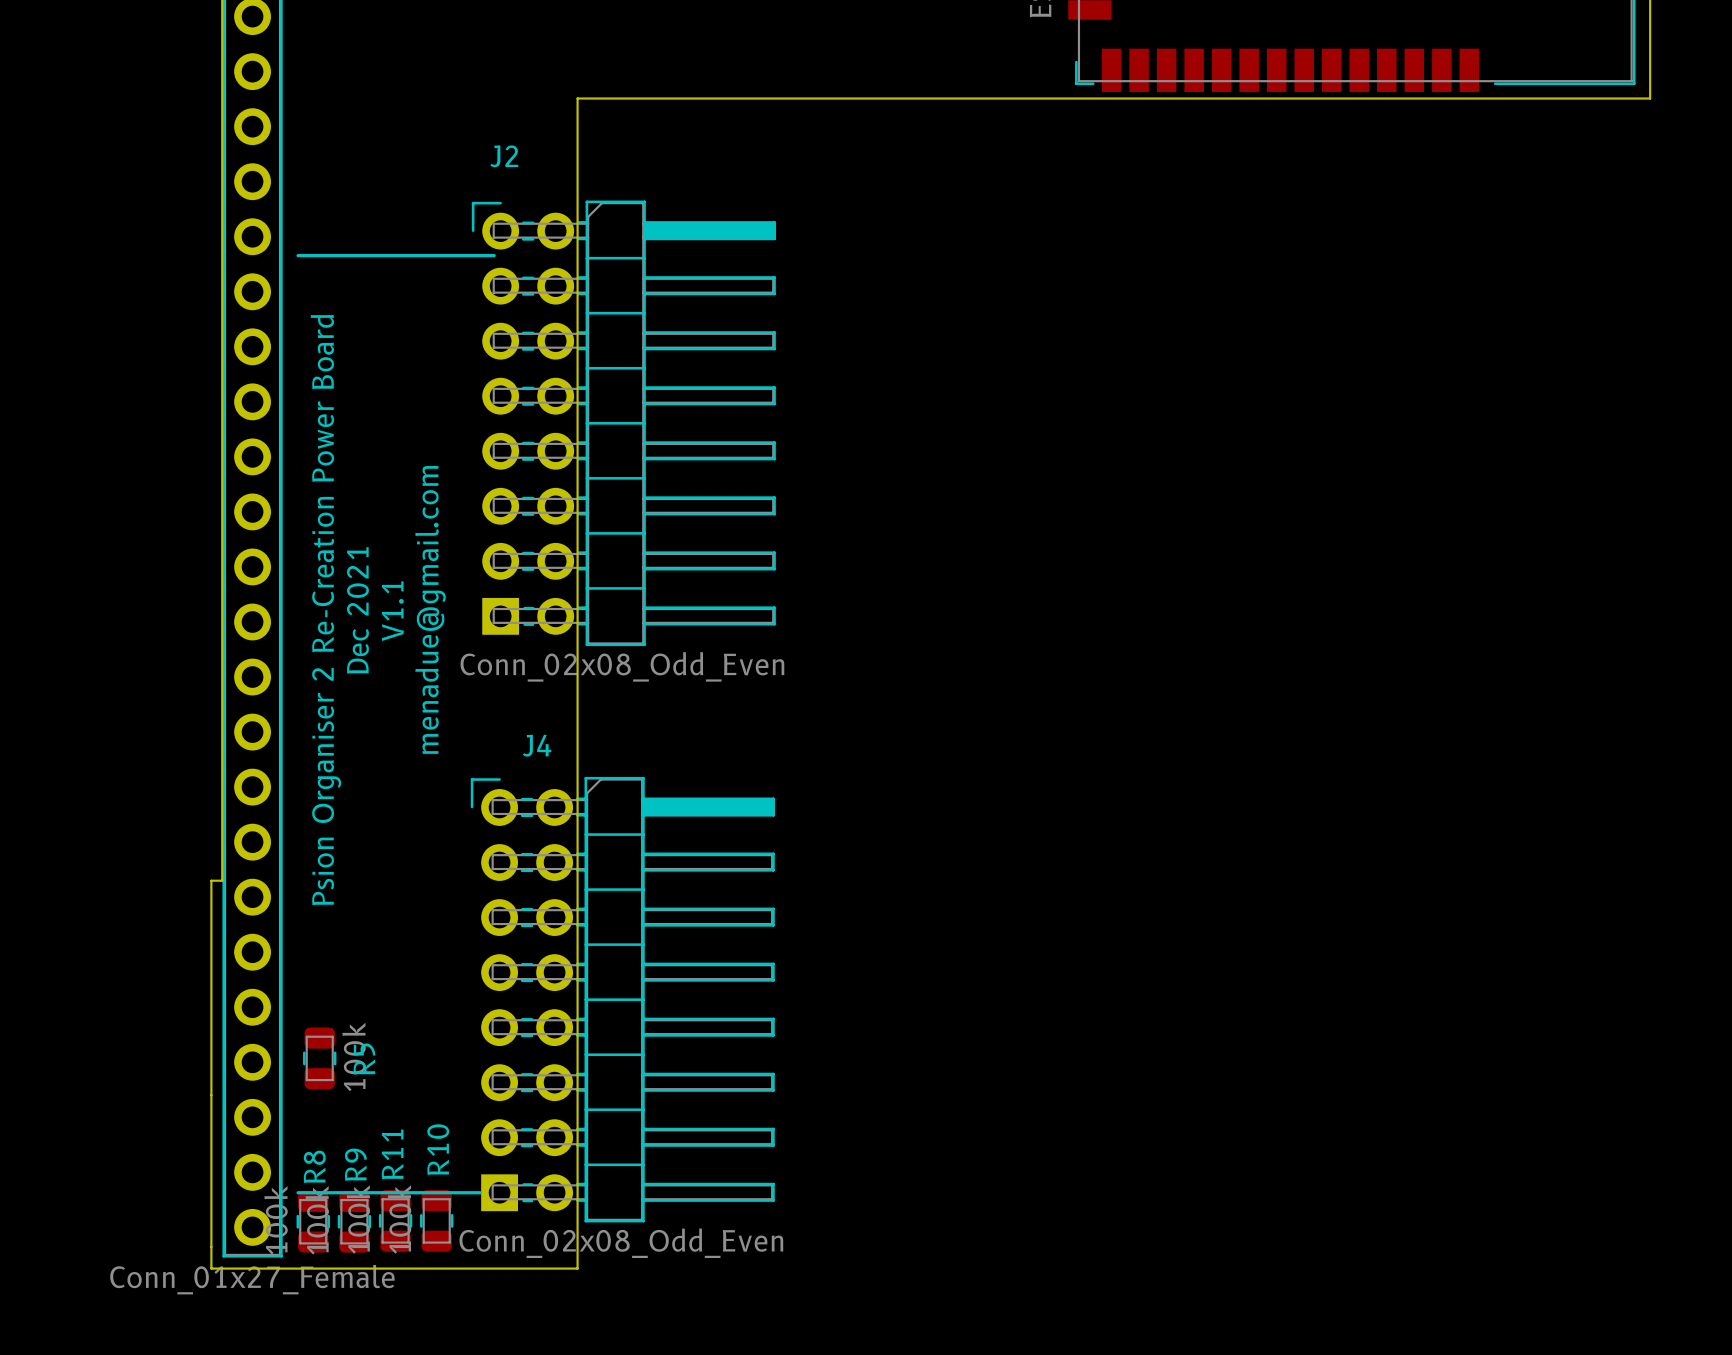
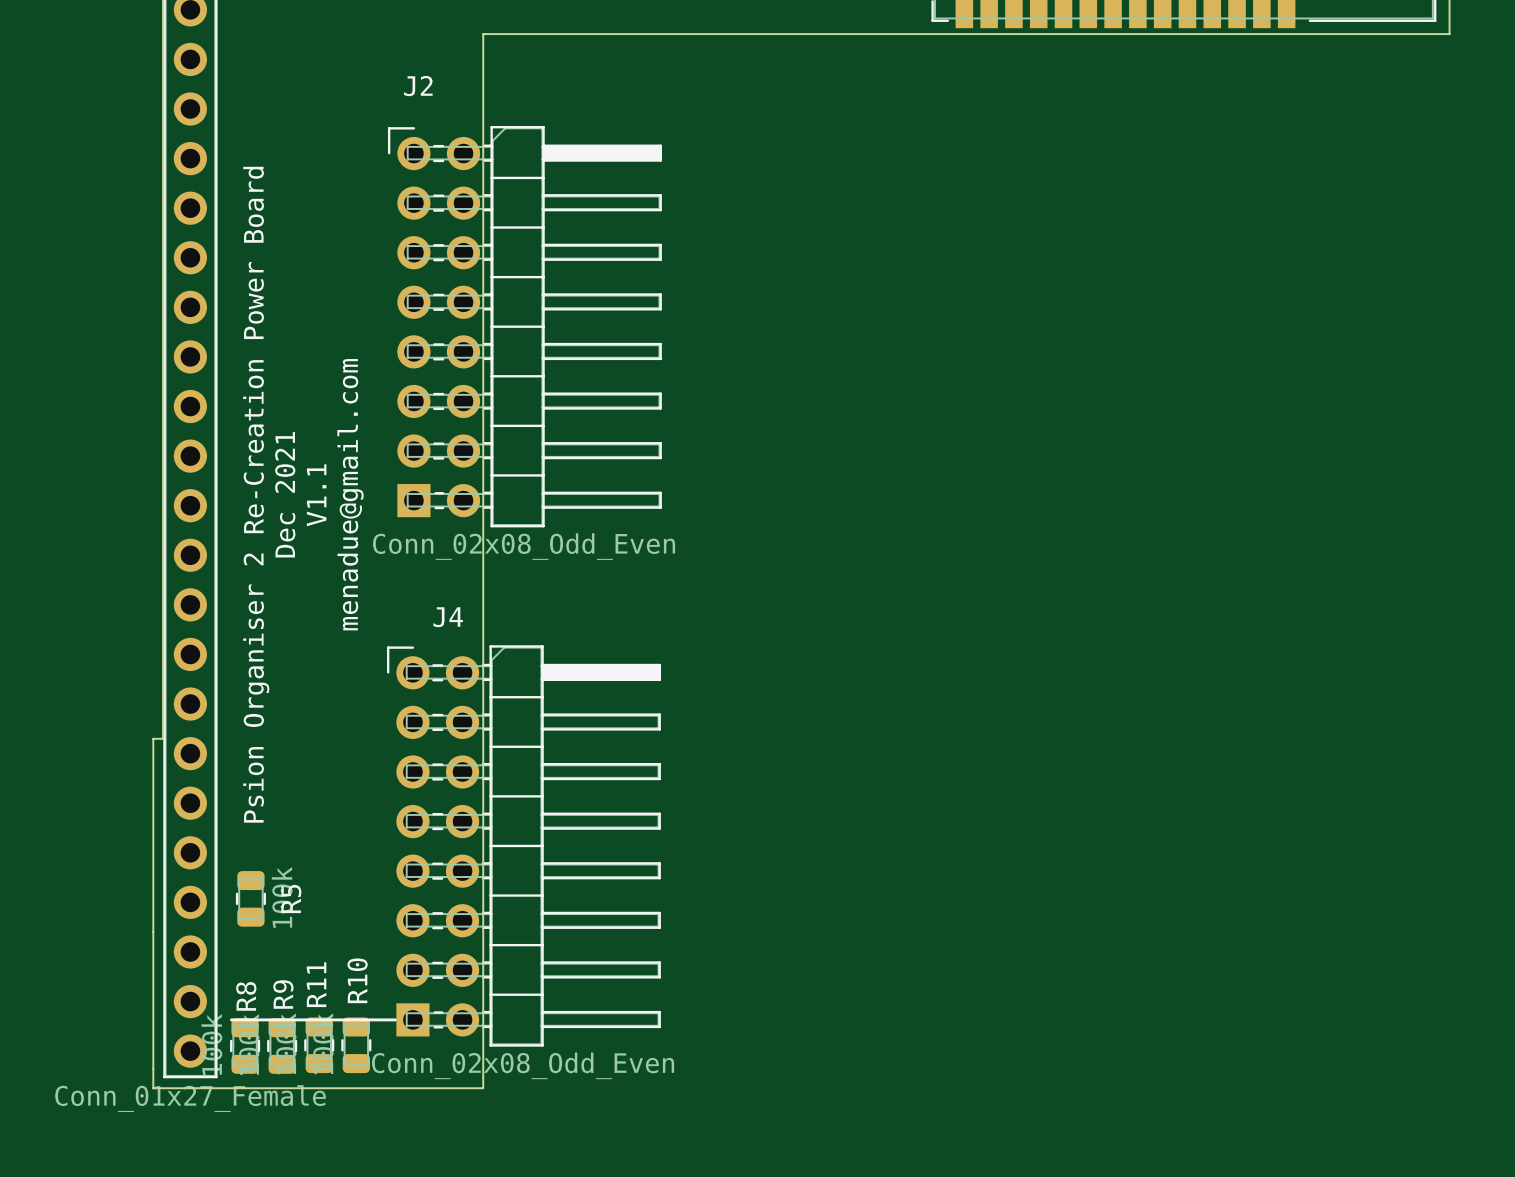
line: (298, 255) (494, 255) -> none

